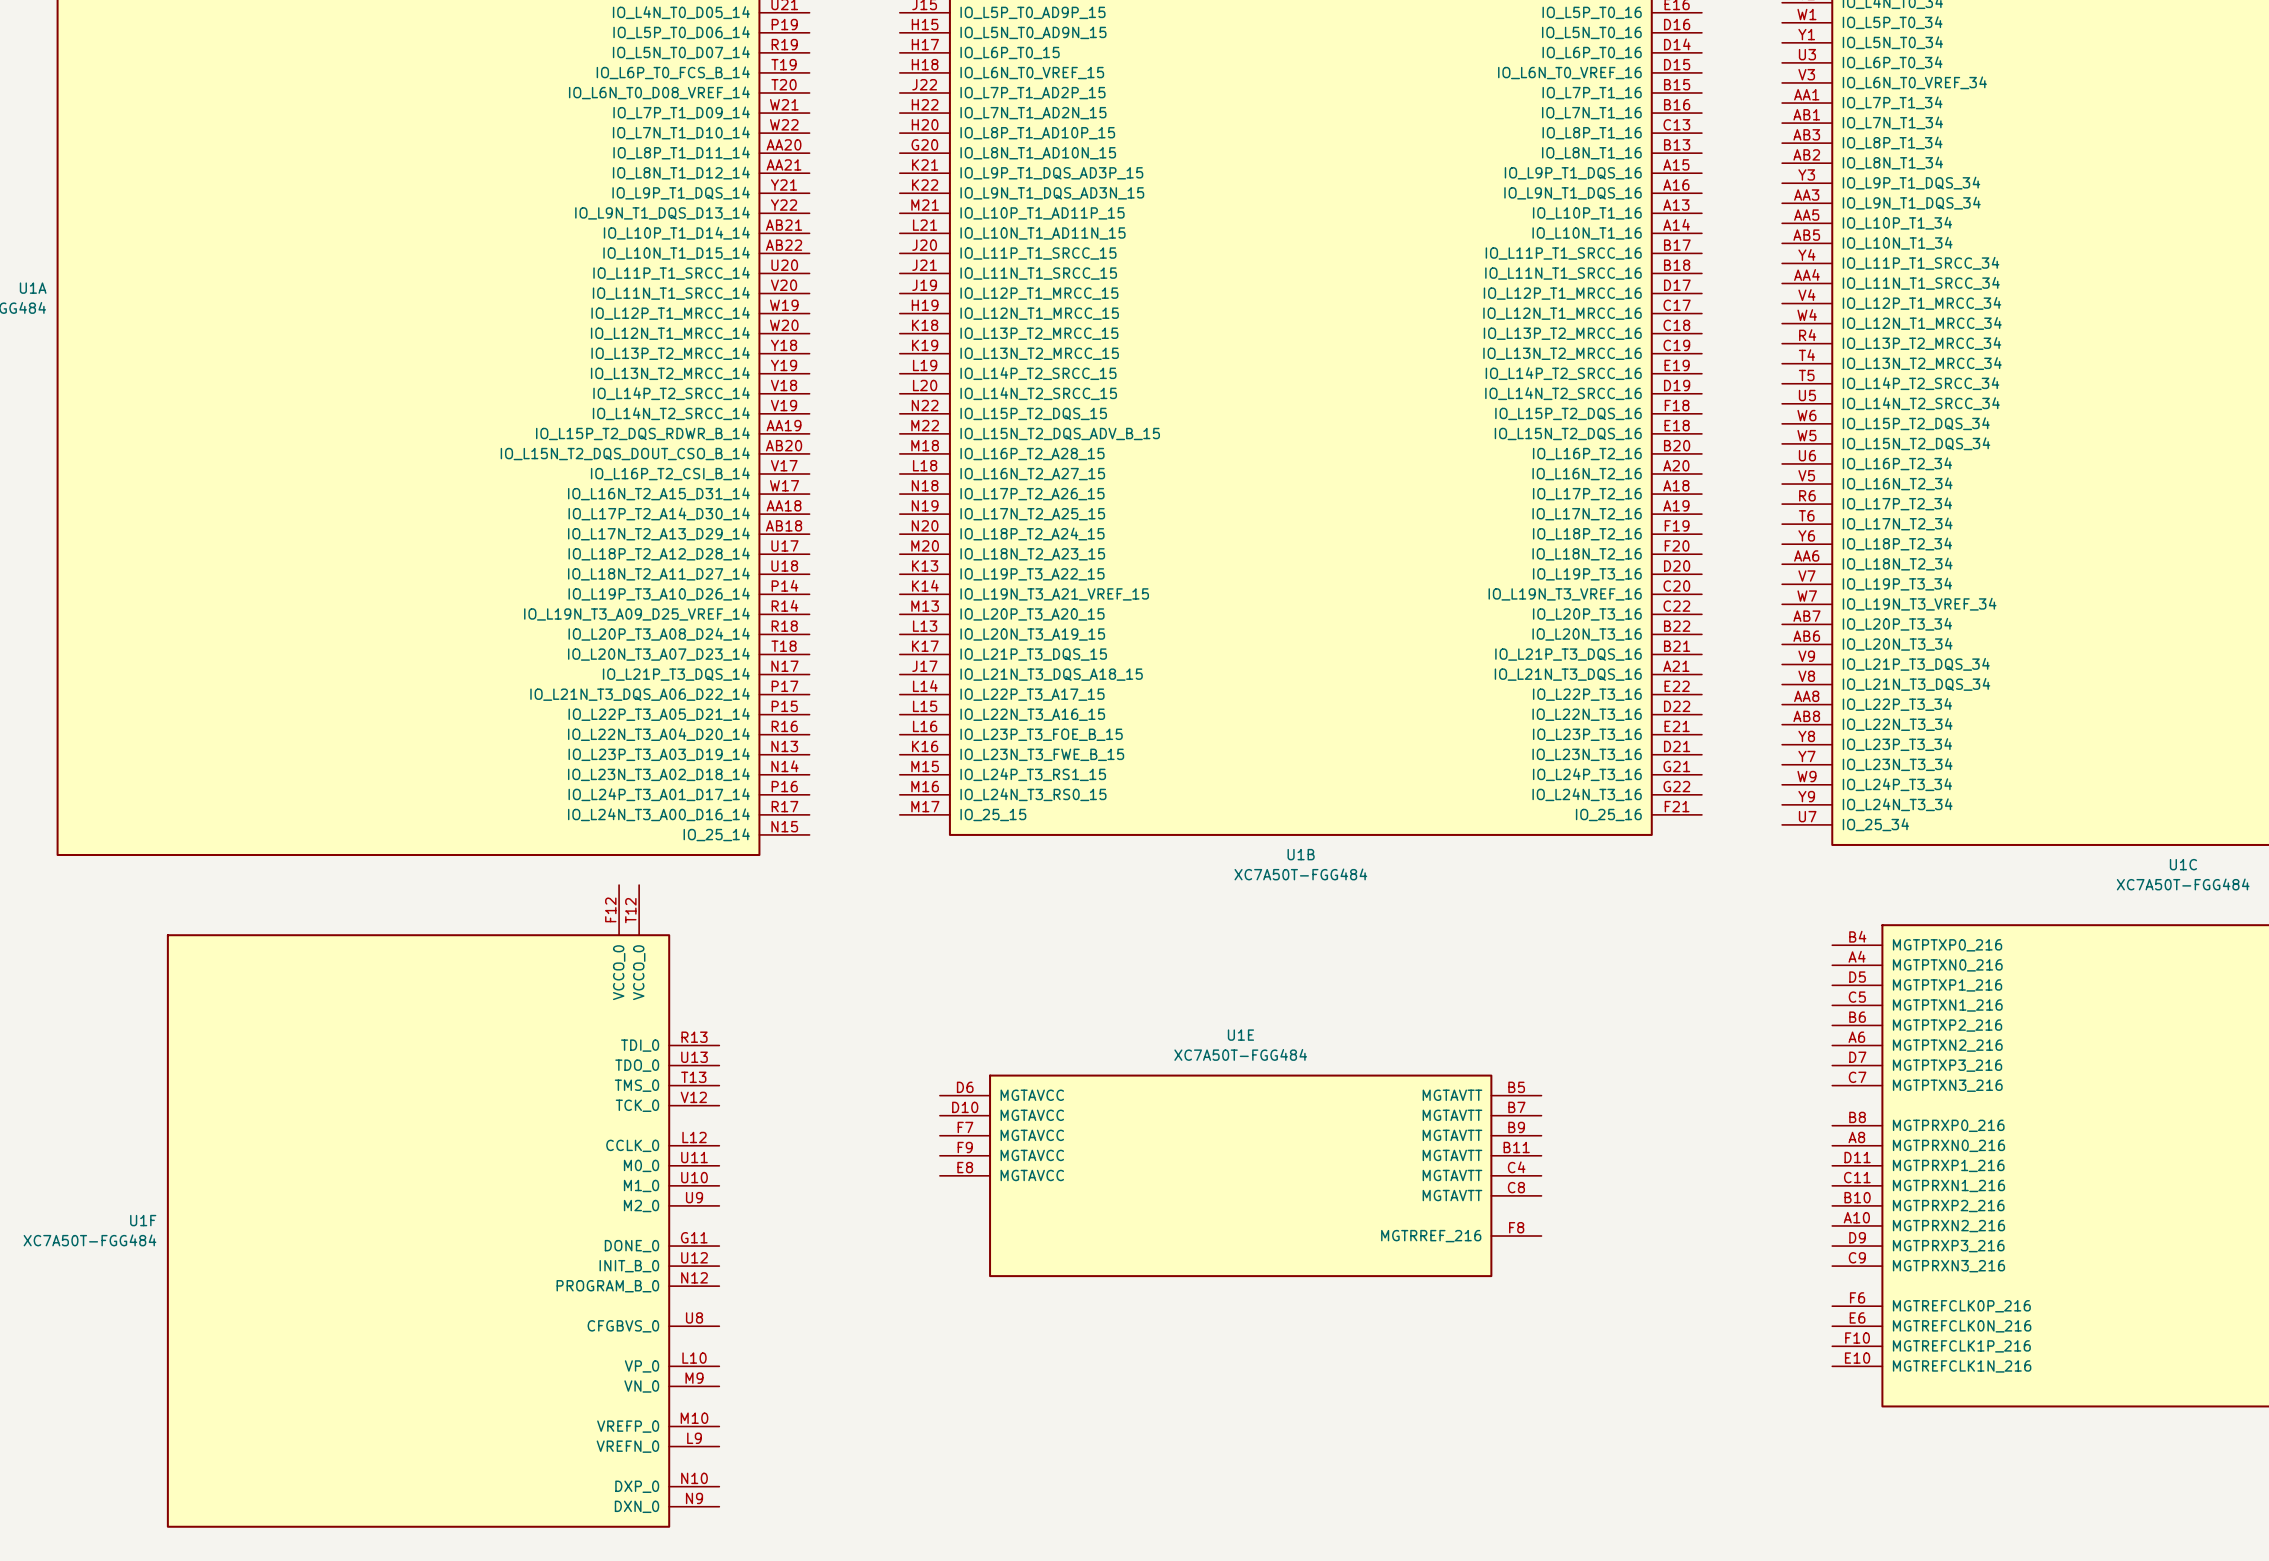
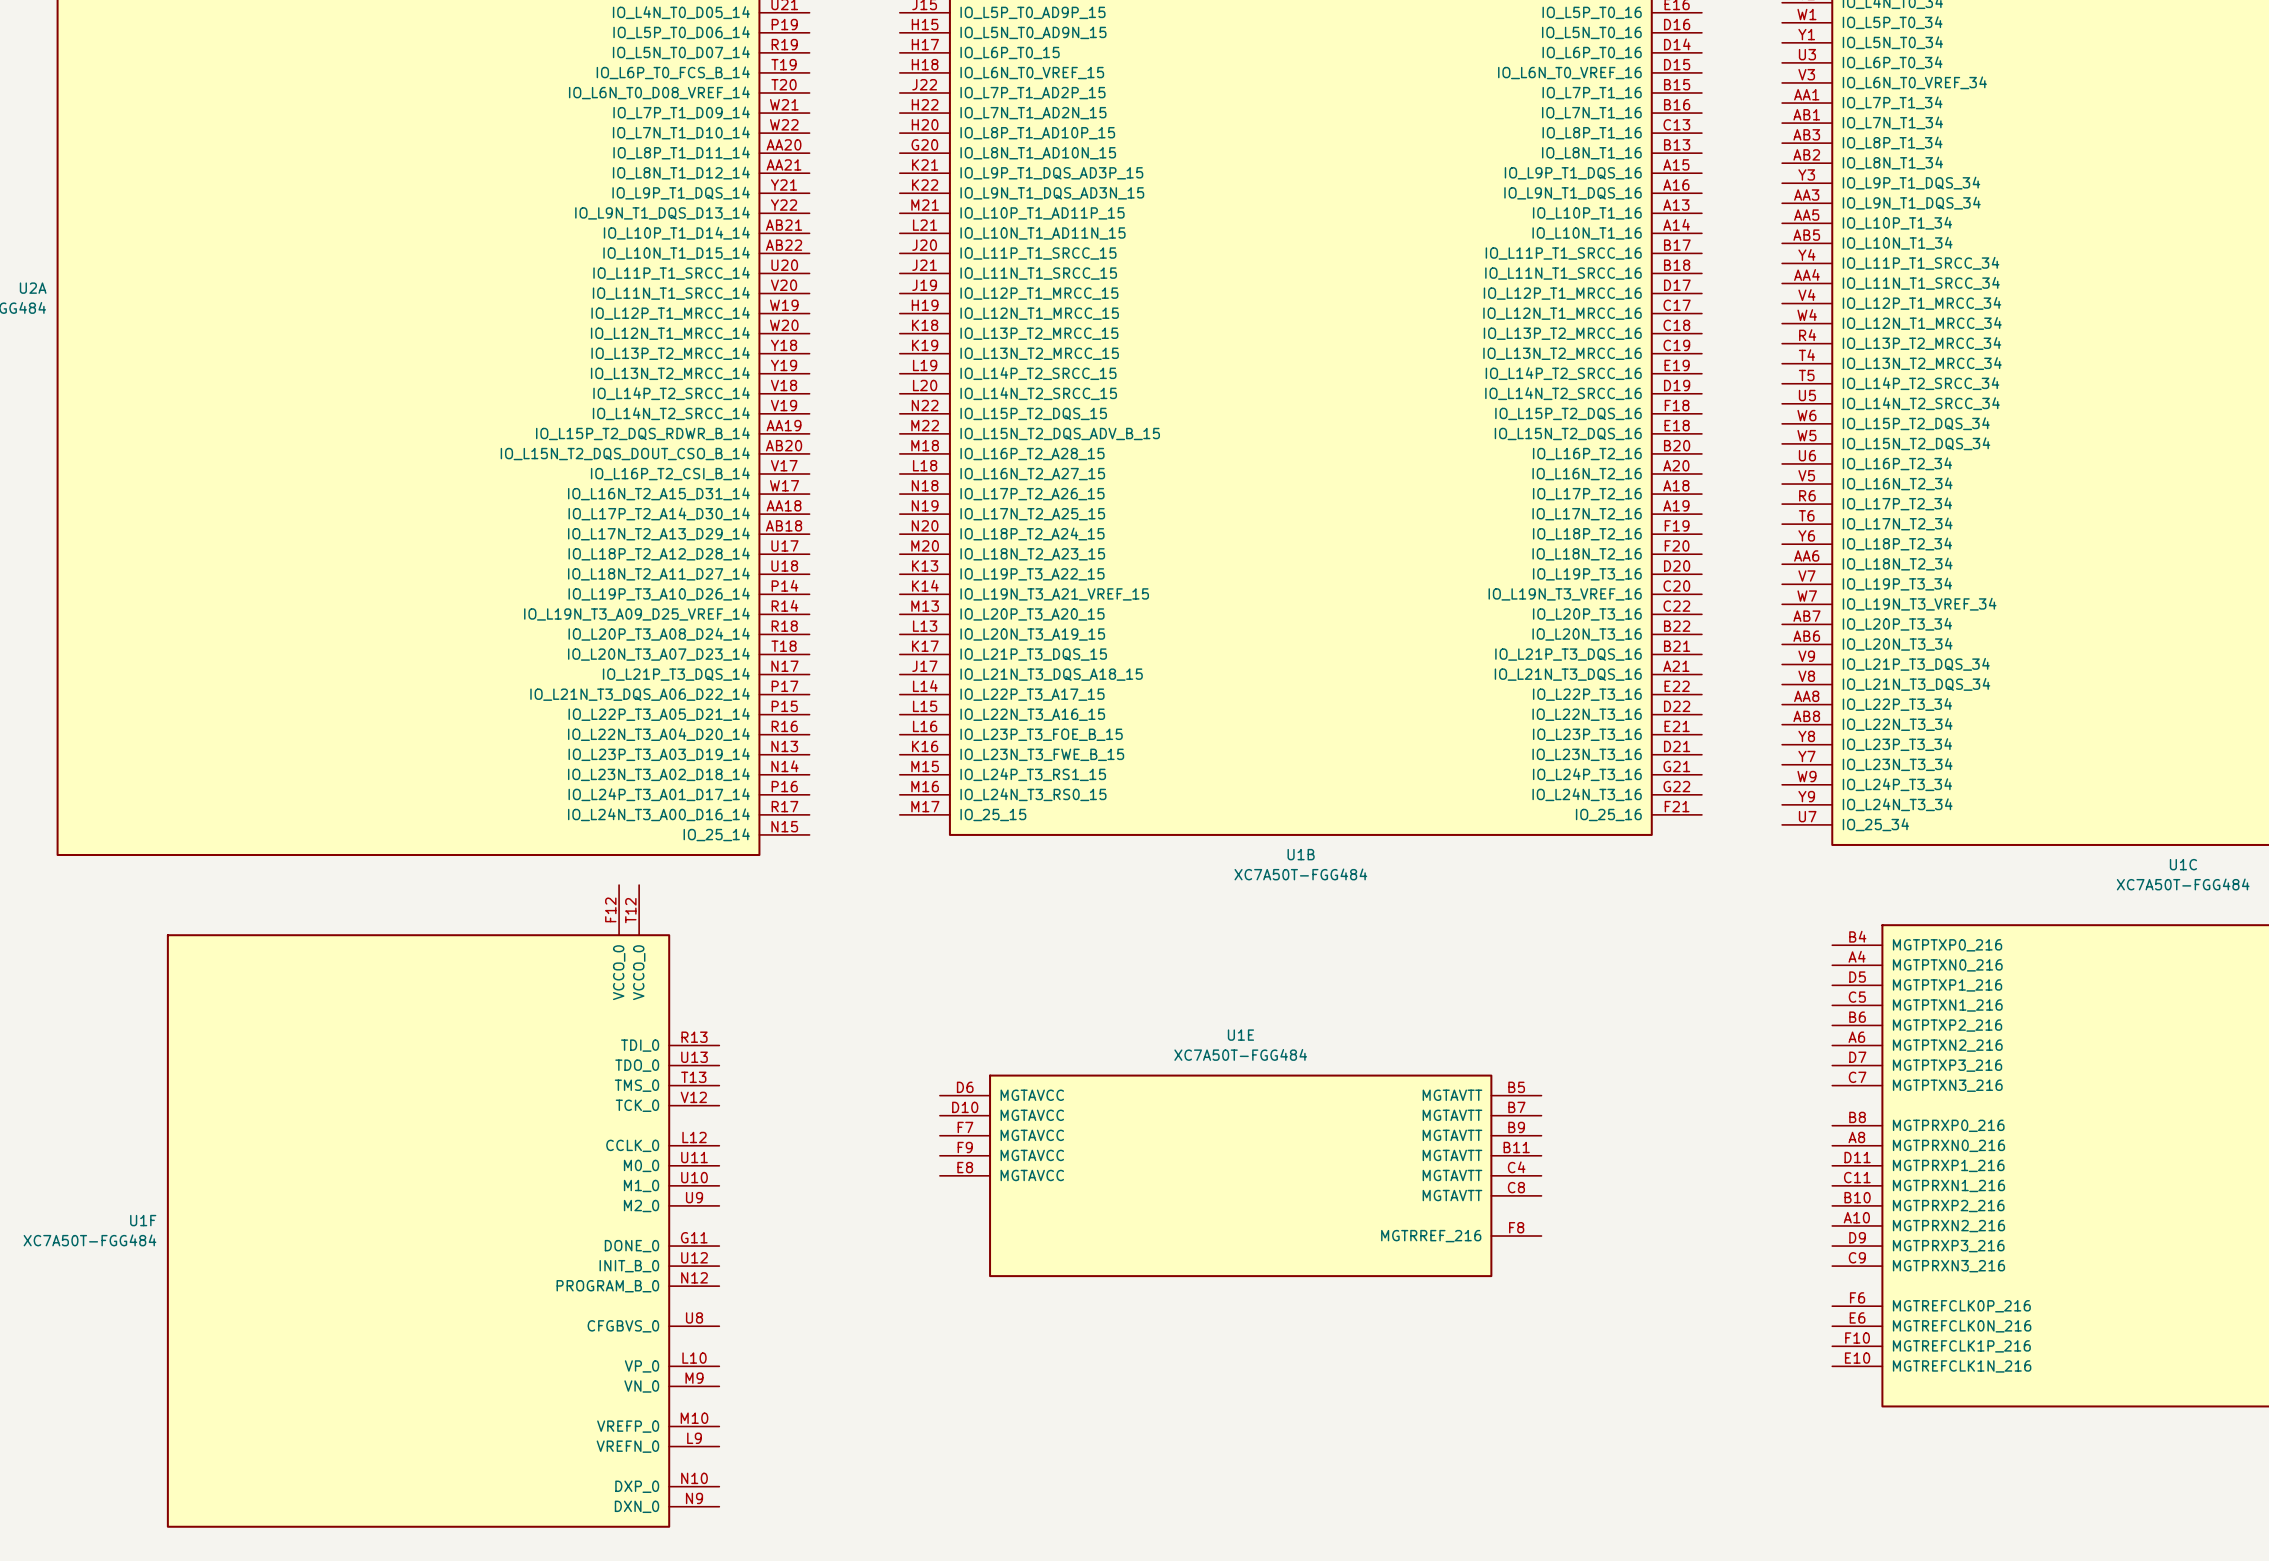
U1A name: U1A (33, 288) -> U2A (33, 288)

